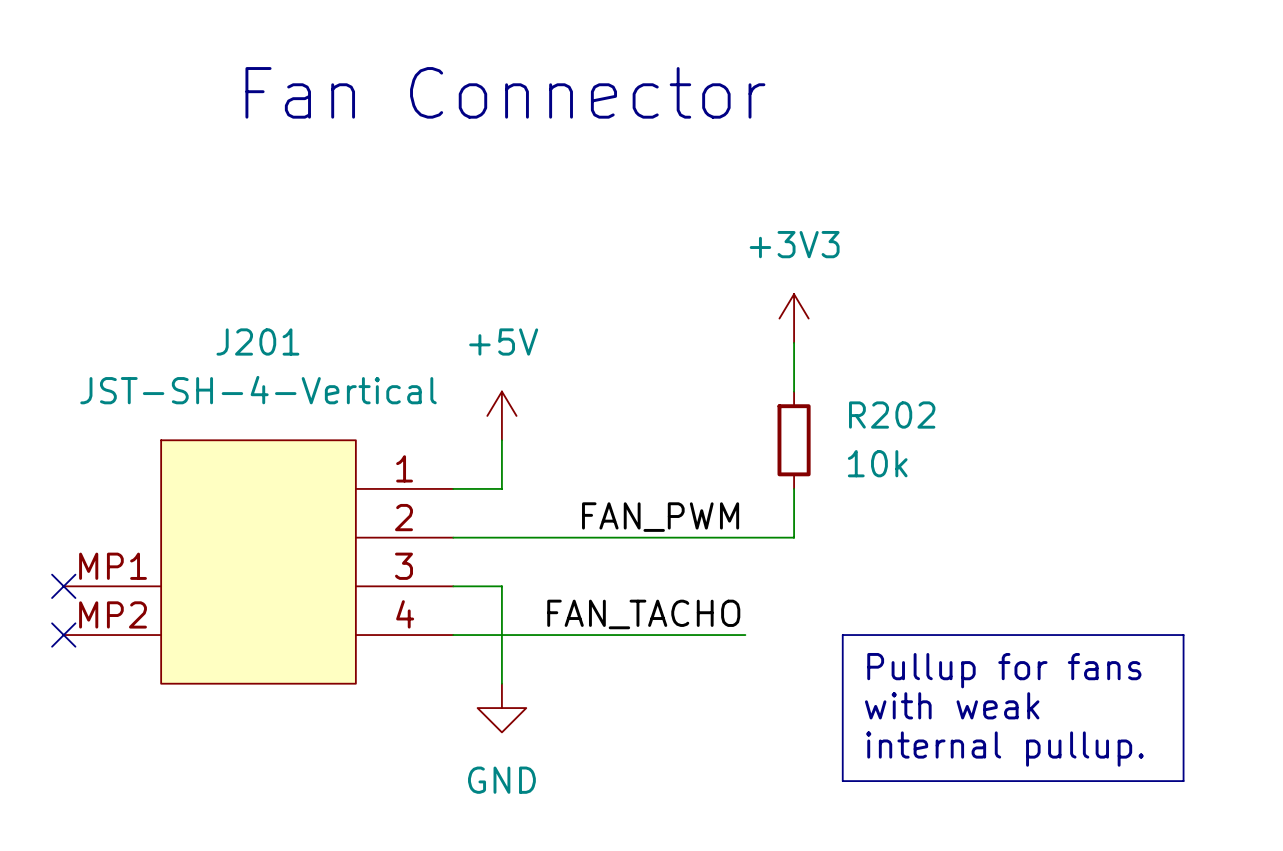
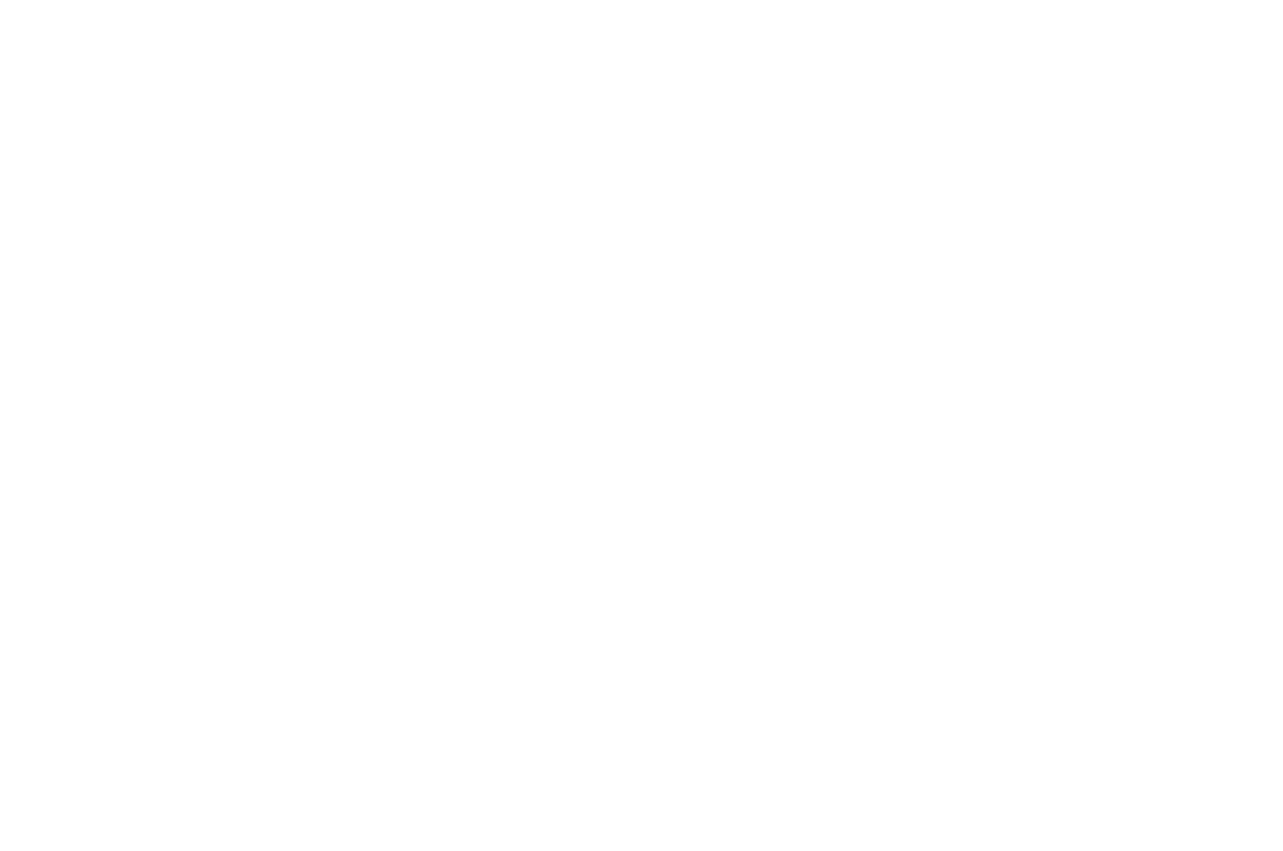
text: Fan Connector (505, 92) -> none
power symbol: +3V3 (794, 318) -> none
wire: (794, 342) (794, 391) -> none
power symbol: +5V (501, 415) -> none
wire: (501, 440) (501, 488) (453, 488) -> none
R202: 10k (794, 440) -> none
wire: (794, 488) (794, 537) (453, 537) -> none
label: FAN_PWM (660, 517) -> none
J201: JST-SH-4-Vertical (258, 561) -> none
no-connect mark: (63, 586) -> none
wire: (453, 586) (501, 586) (501, 683) -> none
label: FAN_TACHO (643, 614) -> none
no-connect mark: (63, 635) -> none
wire: (453, 635) (745, 635) -> none
line: (842, 635) (1183, 635) (1183, 781) (842, 781) (842, 635) -> none
text: Pullup for fans (1004, 670) -> none
text: with weak (952, 705) -> none
power symbol: GND (501, 708) -> none
text: internal pullup. (1004, 749) -> none

